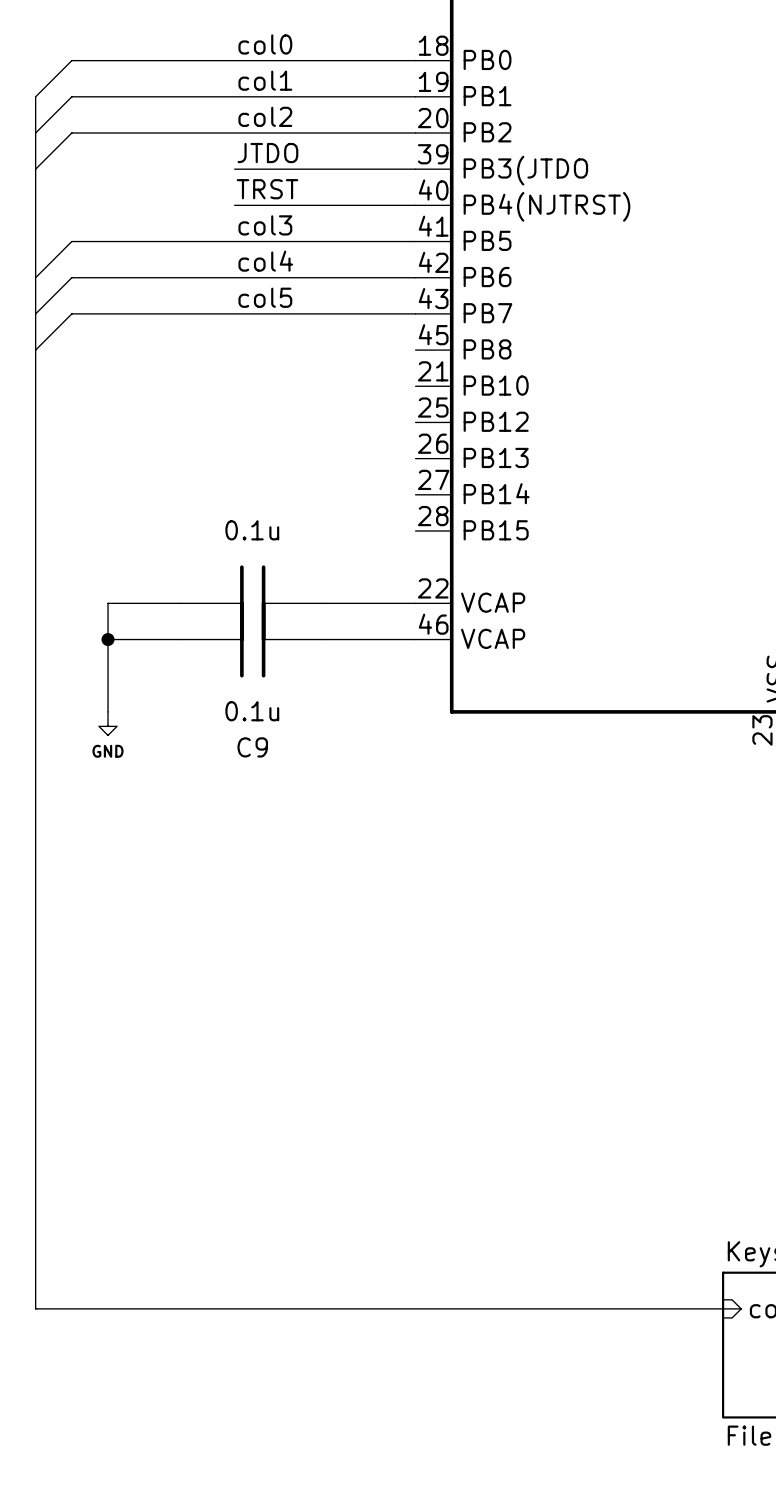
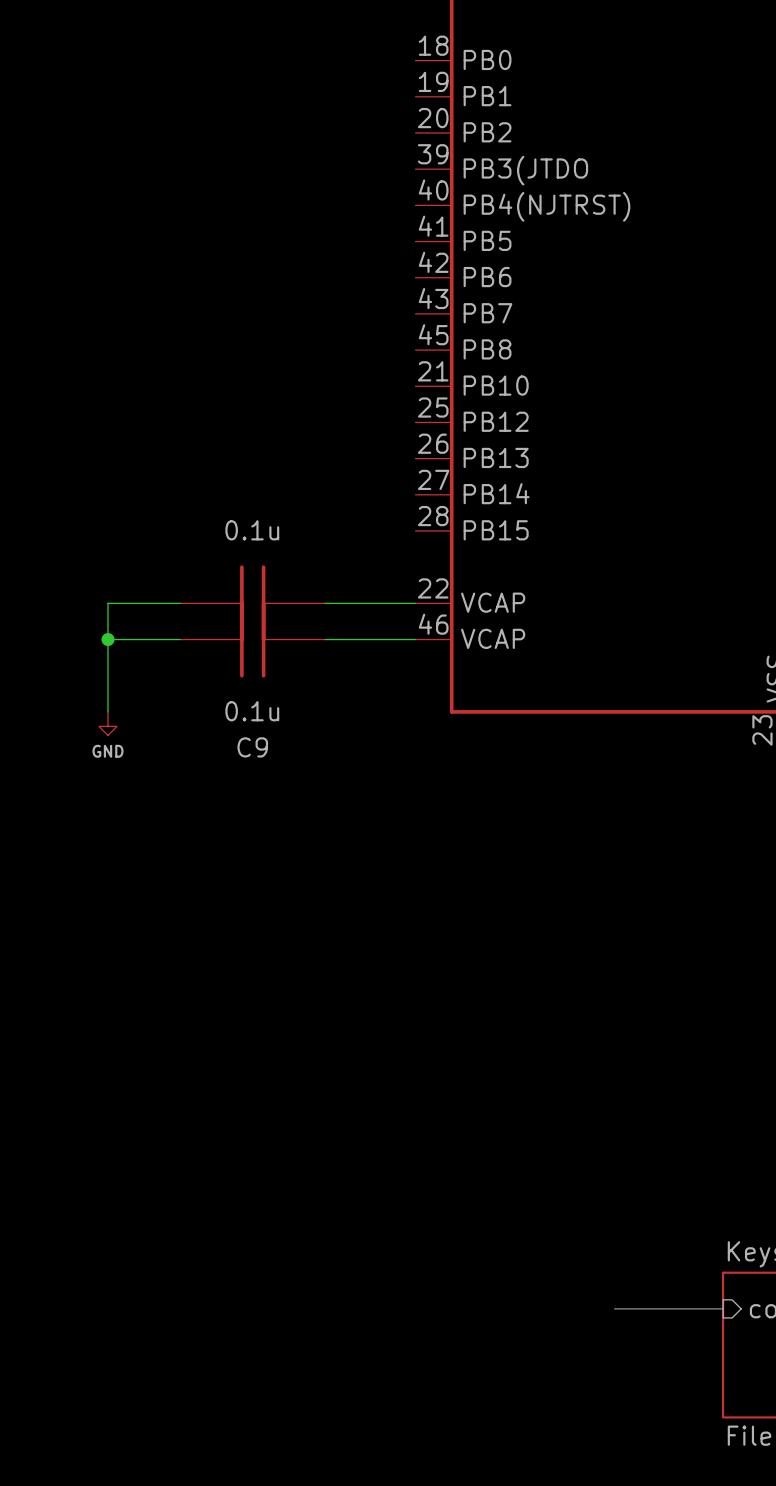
label: col0 (265, 44) -> none
wire: (415, 60) (71, 60) (35, 96) -> none
label: col1 (265, 80) -> none
bus: (35, 96) (35, 1308) (614, 1308) -> none
wire: (415, 96) (71, 96) (35, 132) -> none
label: col2 (265, 116) -> none
wire: (415, 132) (71, 132) (35, 169) -> none
label: JTDO (267, 153) -> none
wire: (234, 169) (415, 169) -> none
label: TRST (267, 189) -> none
wire: (234, 205) (415, 205) -> none
label: col3 (265, 225) -> none
wire: (415, 241) (71, 241) (35, 277) -> none
label: col4 (265, 261) -> none
wire: (415, 277) (71, 277) (35, 313) -> none
label: col5 (265, 297) -> none
wire: (415, 313) (71, 313) (35, 350) -> none
bus: (723, 1308) (741, 1308) -> none

